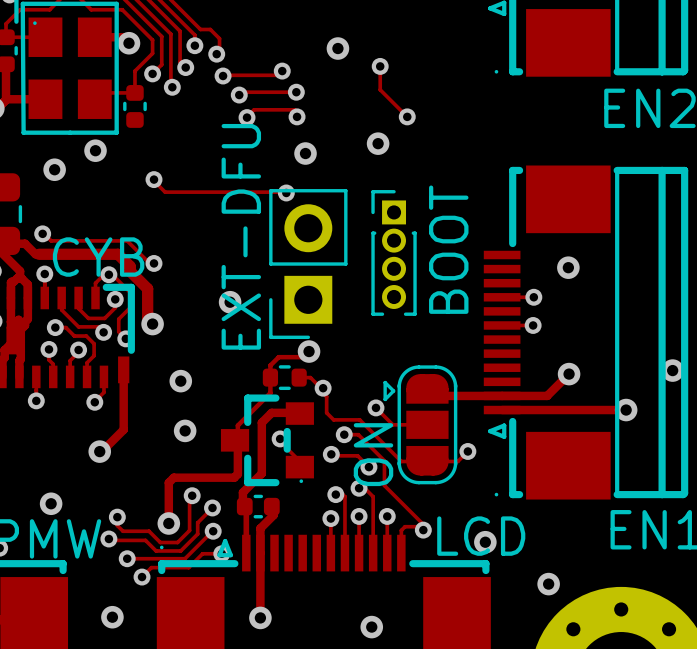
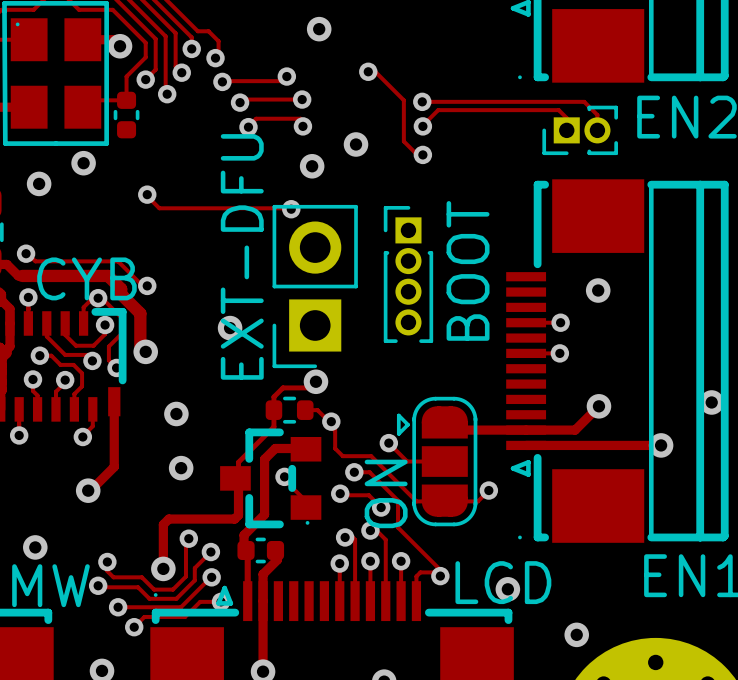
via position: (337, 48) -> (319, 29)
track: none -> (368, 71) (375, 71) (403, 100) (403, 141) (417, 154) (422, 154)
via: none -> (368, 71)
track: (380, 66) (380, 89) (407, 116) -> none
via: (380, 66) -> none
track: none -> (422, 101) (584, 101) (597, 115) (597, 130)
via: none -> (422, 101)
track: none -> (422, 128) (422, 125) (438, 110) (558, 110) (566, 118) (566, 130)
part: none -> (580, 130)
via position: (378, 143) -> (356, 144)
via: none -> (422, 154)

